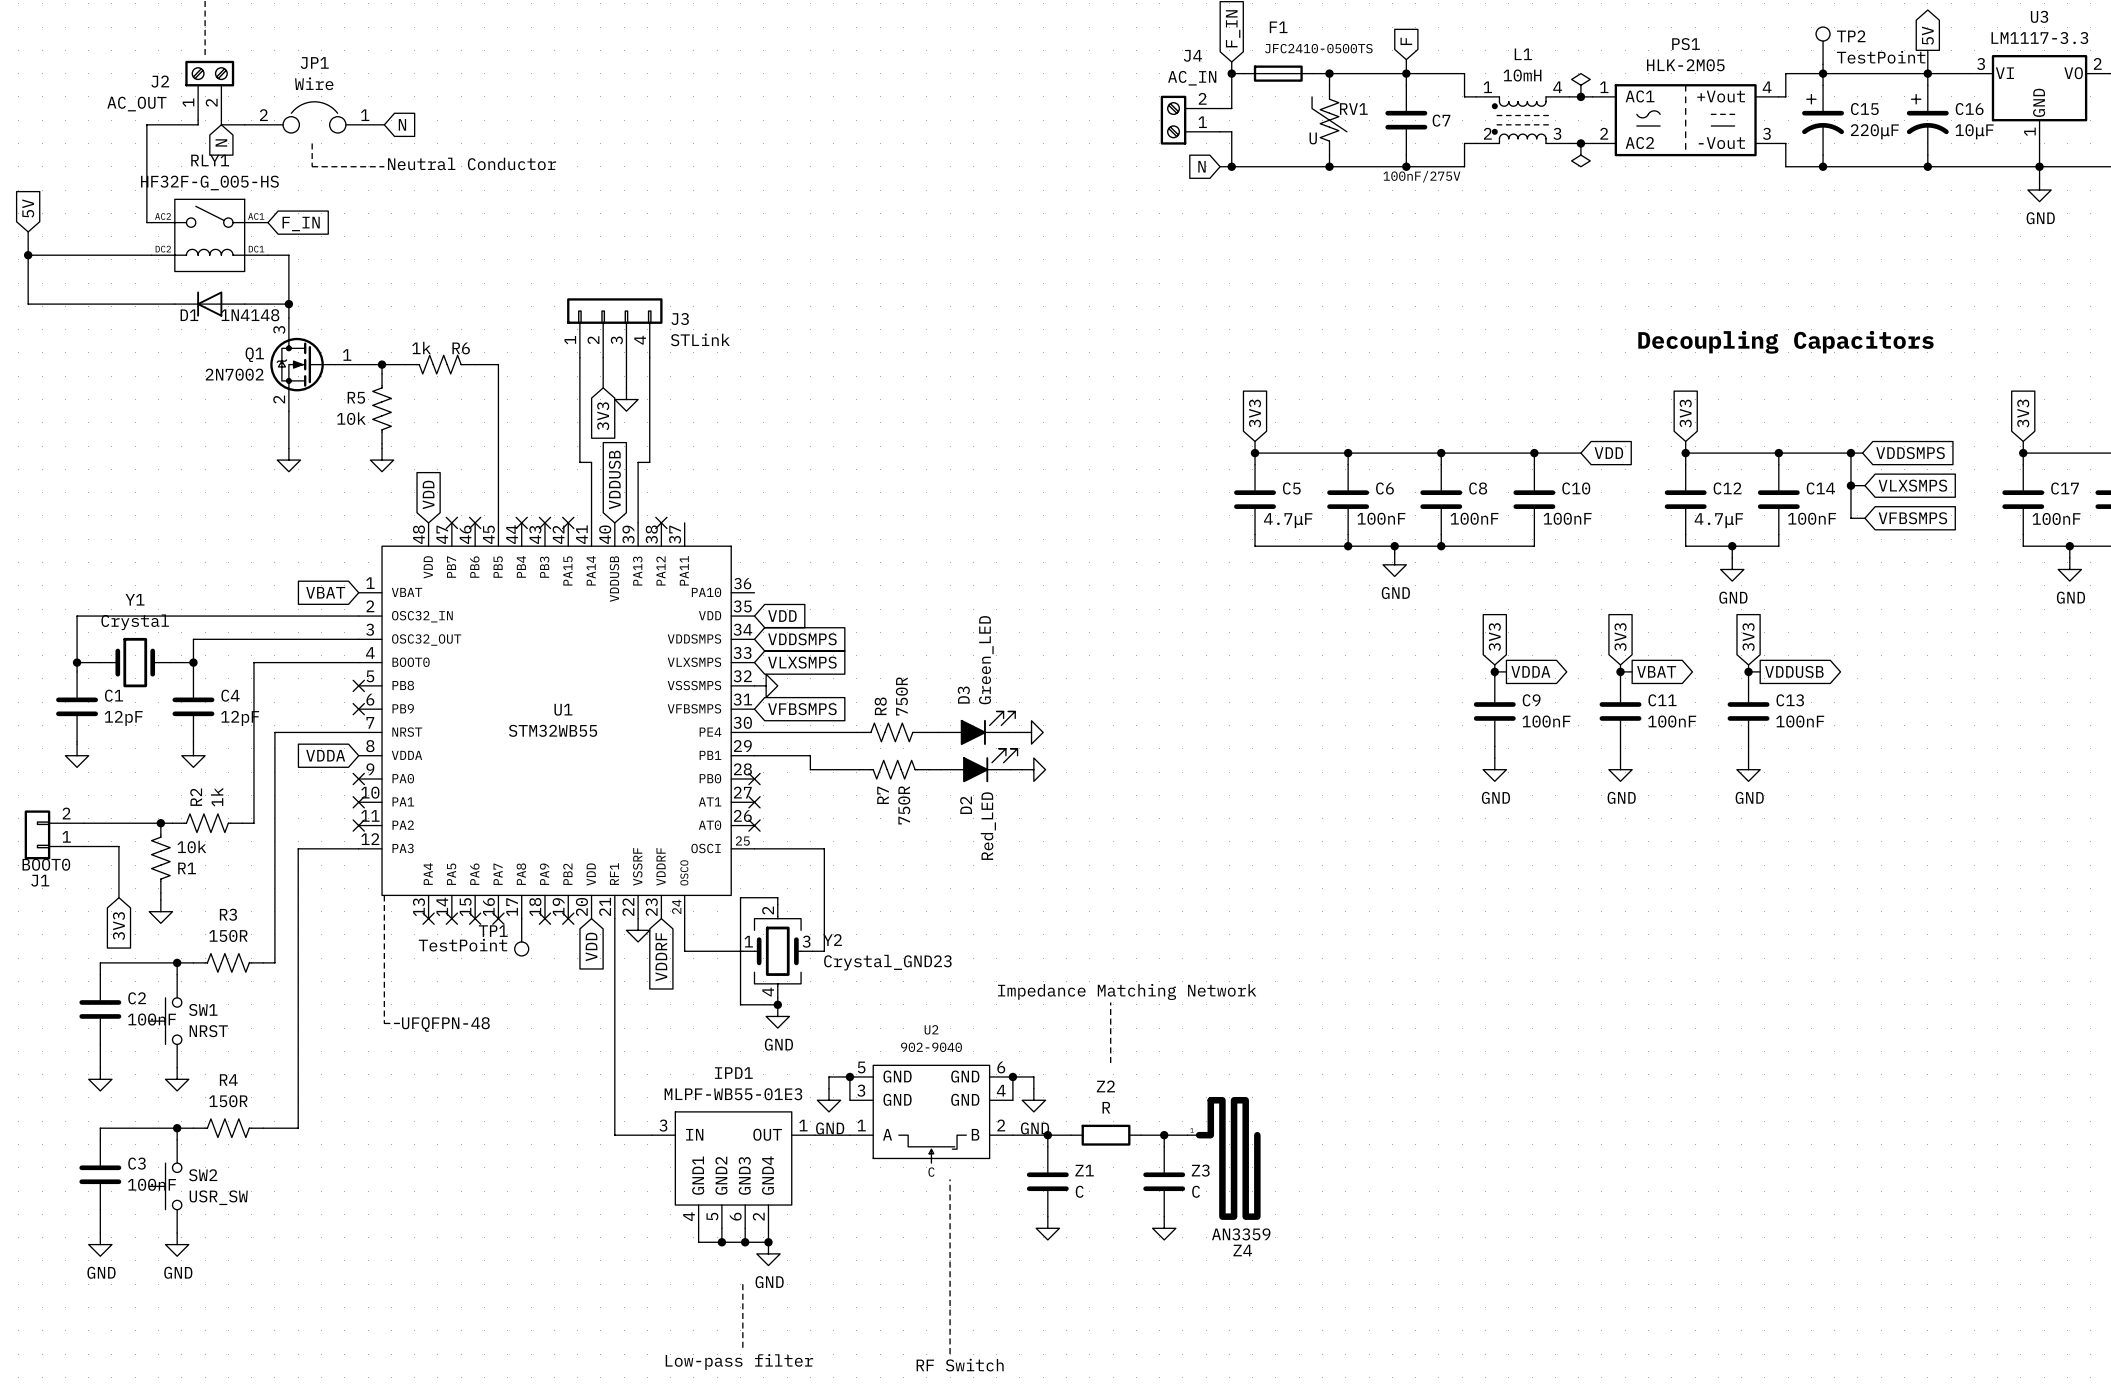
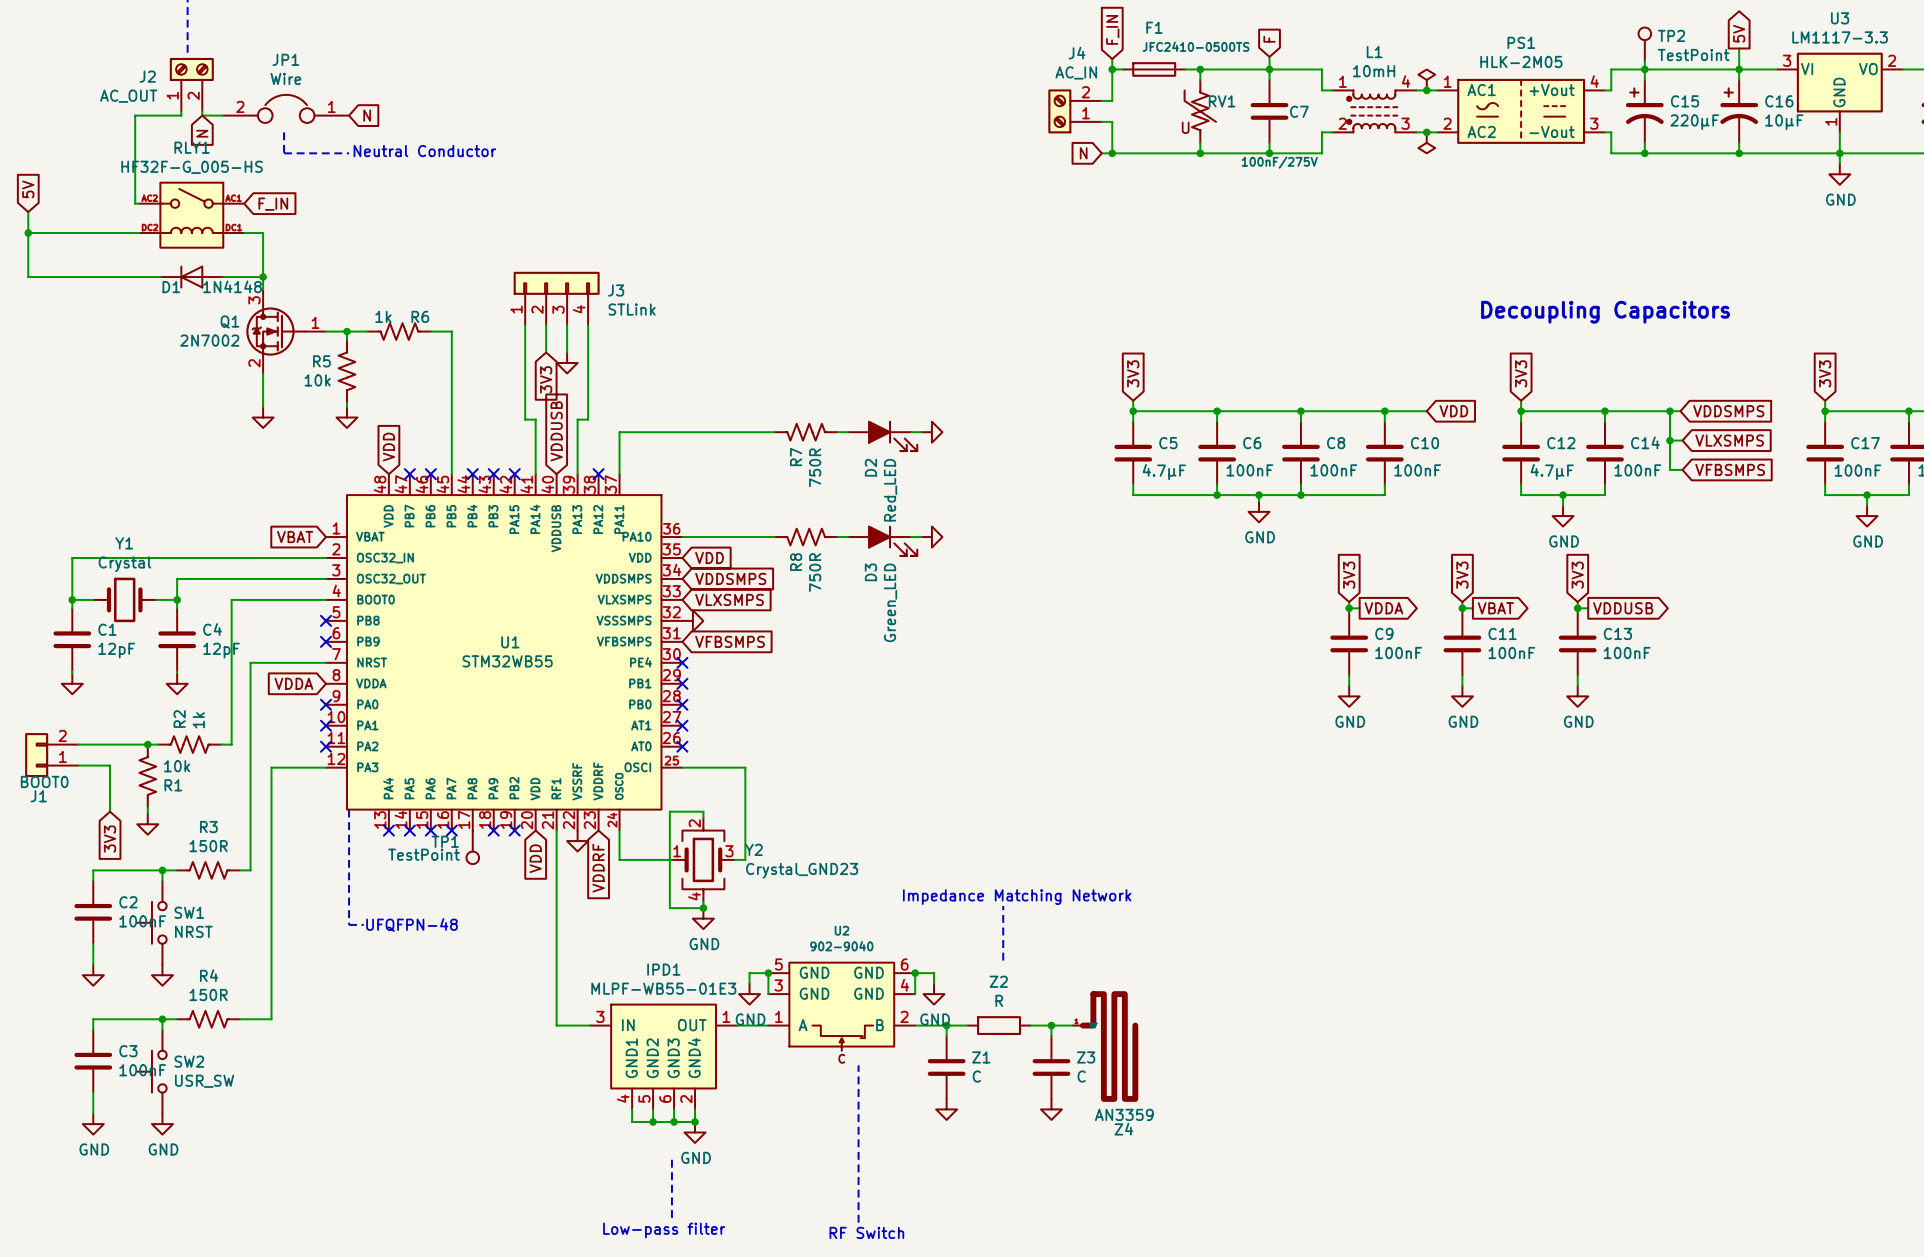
wire: none -> (774, 432) (619, 432) (619, 474)
wire: none -> (837, 432) (848, 432)
wire: none -> (910, 432) (921, 432)
power symbol: none -> (931, 432)
power symbol: none -> (931, 537)
R8 value position: 750R (901, 696) -> 750R (815, 572)
R8 name position: R8 (880, 706) -> R8 (796, 562)
D3 position: (976, 728) -> (882, 540)
D3 flip: as is (987, 728) -> up-down (892, 540)
wire: (754, 732) (856, 732) -> (682, 537) (774, 537)
no-connect mark: none -> (682, 662)
R8 flip: as is (891, 732) -> left-right (806, 537)
R8 position: (891, 732) -> (806, 537)
wire: (926, 732) (938, 732) -> (837, 537) (848, 537)
wire: (1008, 732) (1019, 732) -> (910, 537) (921, 537)
power symbol: (1031, 732) -> none
wire: (754, 755) (810, 755) (810, 769) (859, 769) -> none
no-connect mark: none -> (682, 683)
D2 position: (979, 765) -> (882, 435)
D2 flip: as is (990, 765) -> up-down (892, 435)
R7 position: (894, 769) -> (806, 432)
wire: (929, 769) (940, 769) -> none
wire: (1010, 769) (1022, 769) -> none
power symbol: (1033, 769) -> none

